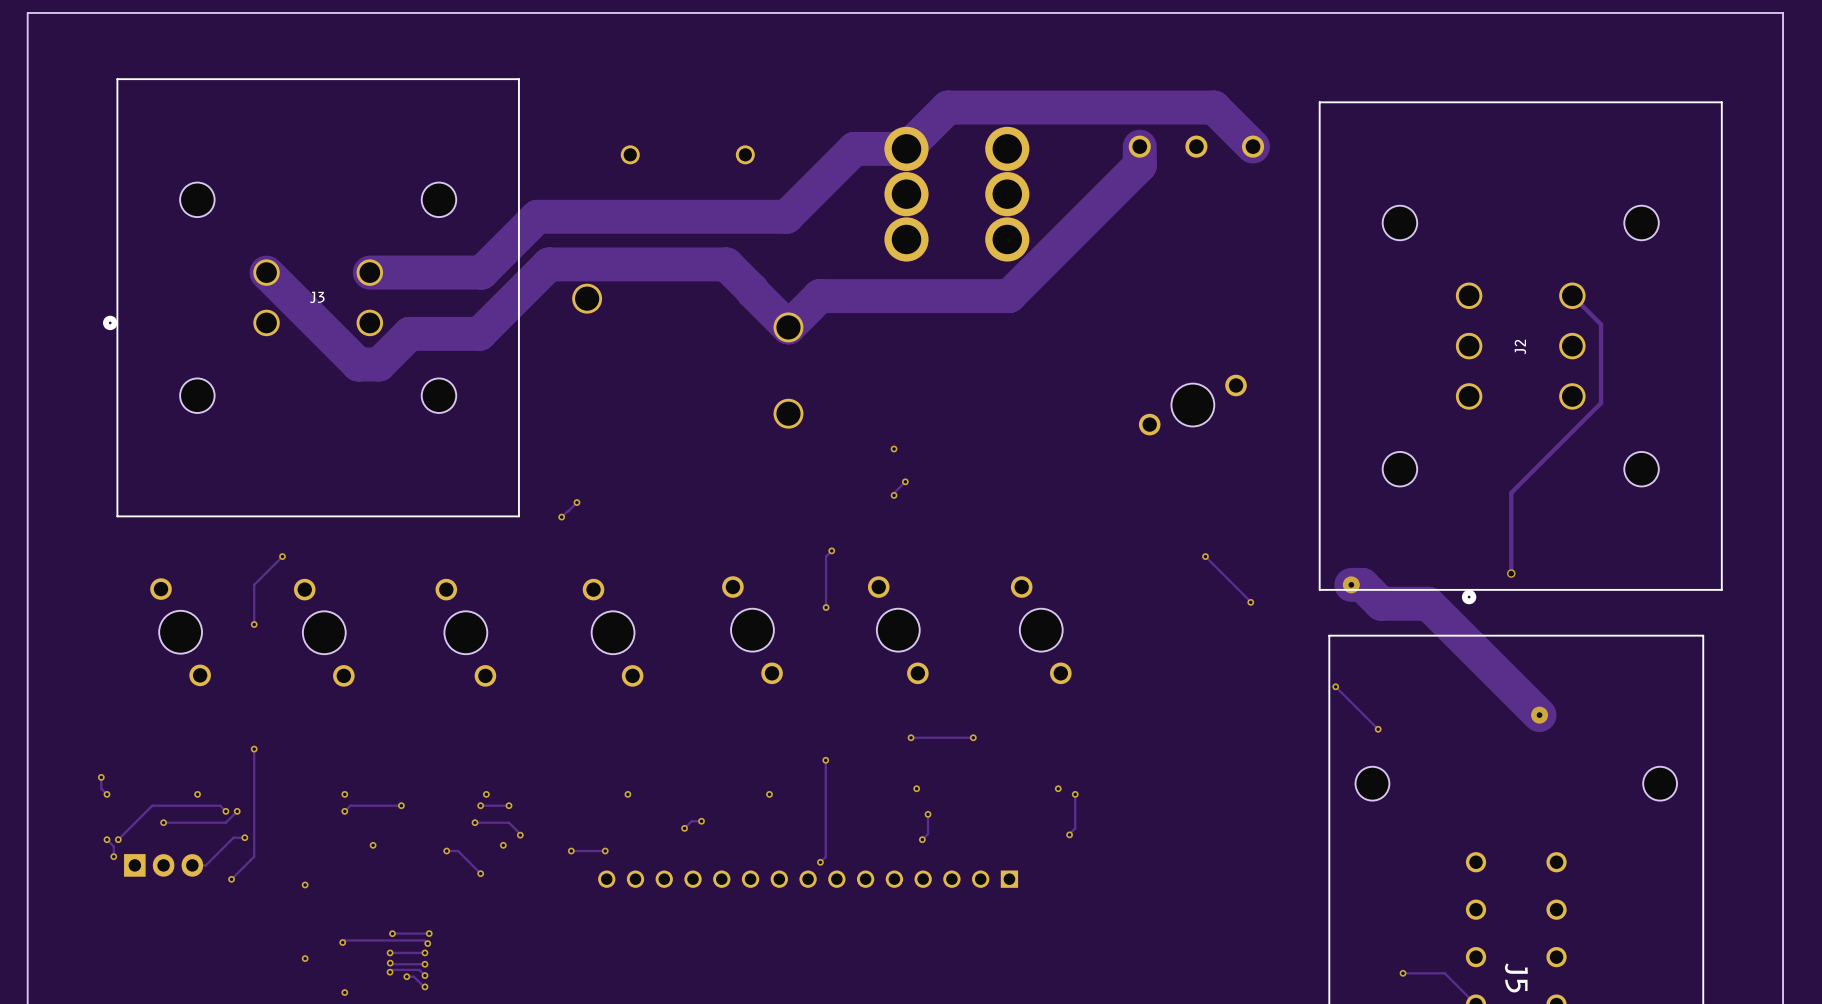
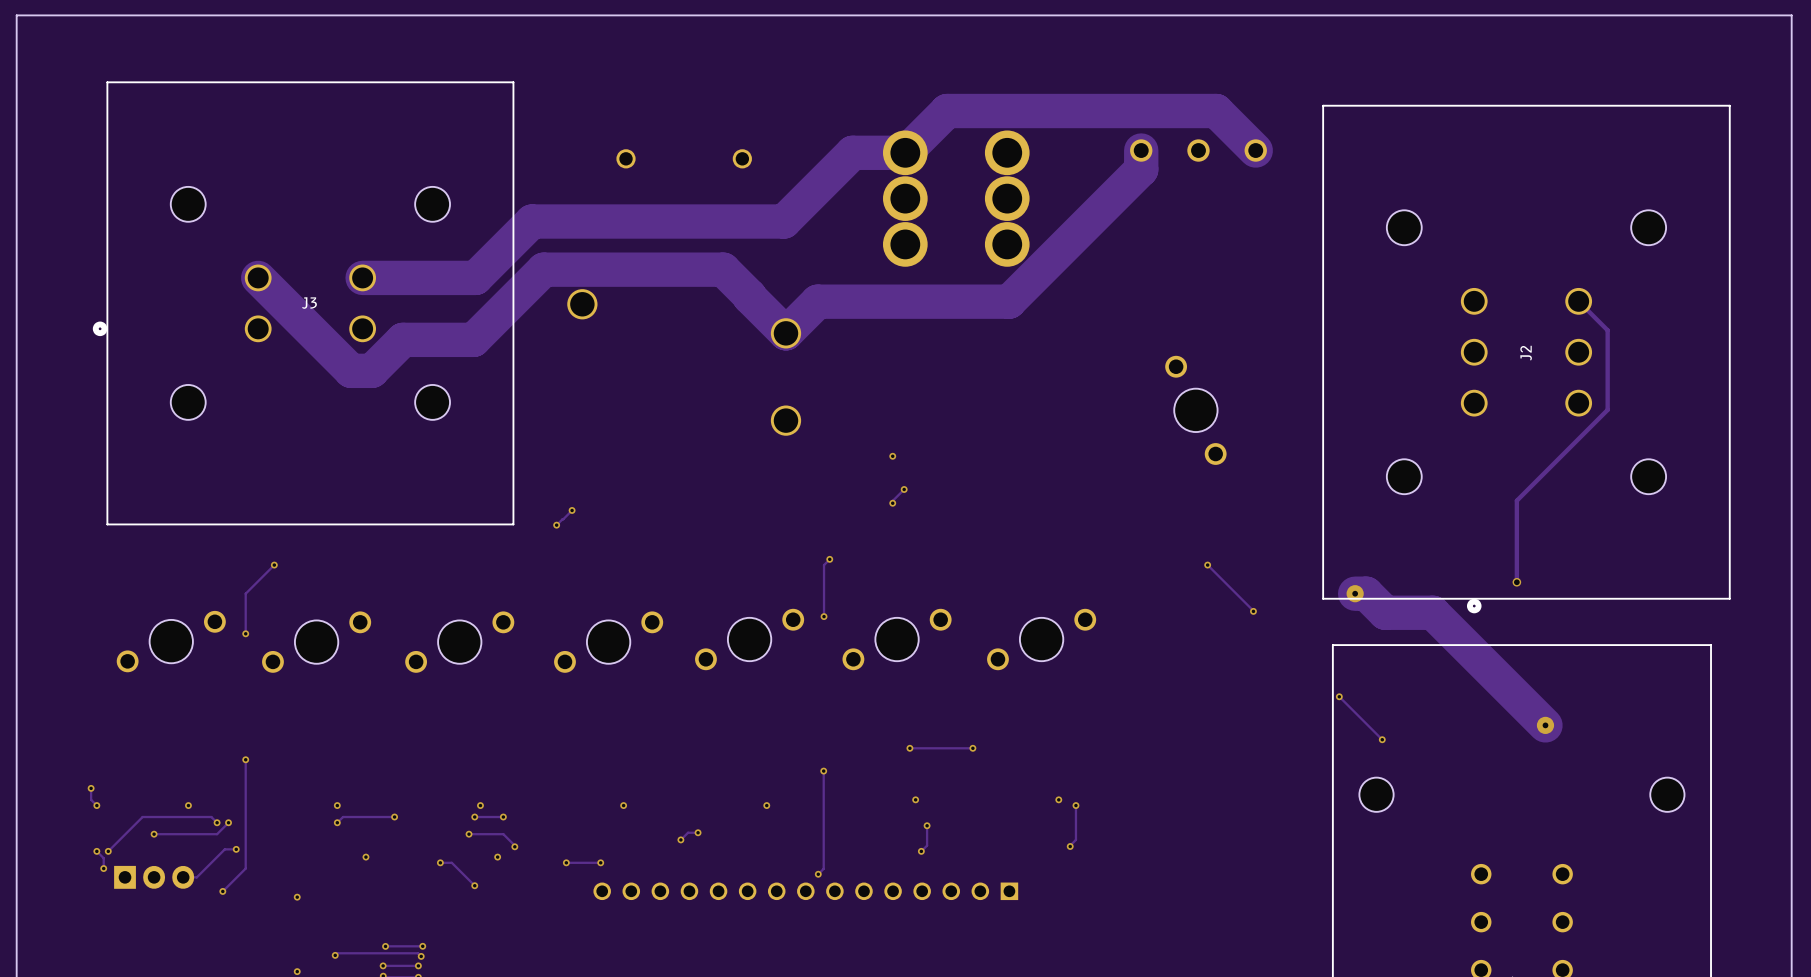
part rotation: 0° (1192, 405) -> 90° clockwise (1195, 410)
part rotation: 0° (752, 630) -> 90° clockwise (749, 639)
part rotation: 0° (898, 630) -> 90° clockwise (897, 639)
part rotation: 0° (1041, 630) -> 90° clockwise (1041, 639)
part rotation: 0° (180, 632) -> 90° clockwise (171, 641)
part rotation: 0° (324, 632) -> 90° clockwise (316, 642)
part rotation: 0° (465, 632) -> 90° clockwise (459, 642)
part rotation: 0° (613, 632) -> 90° clockwise (608, 642)

